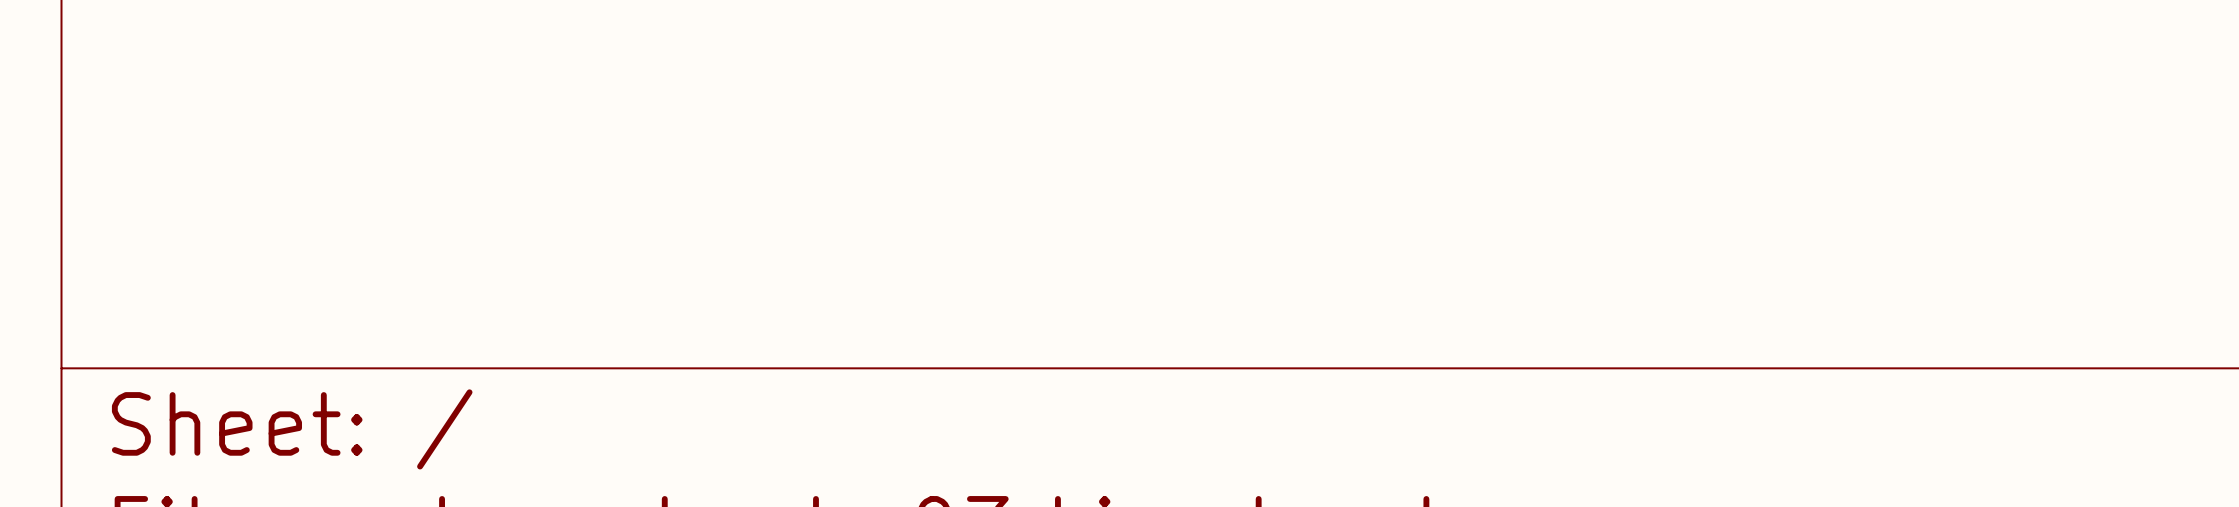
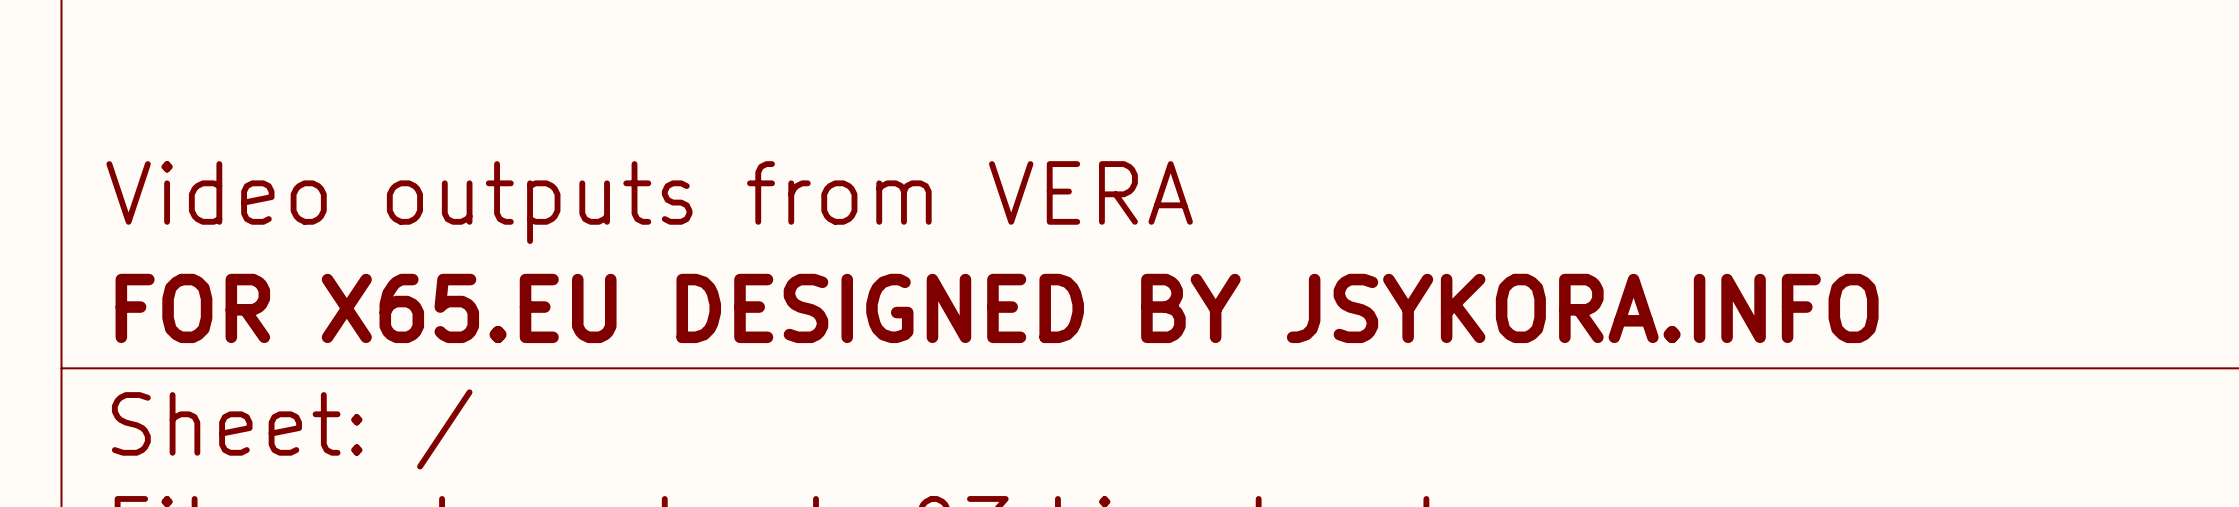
title block: none -> Video outputs from VERA (649, 202)
title block: none -> FOR X65.EU DESIGNED BY JSYKORA.INFO (997, 308)

